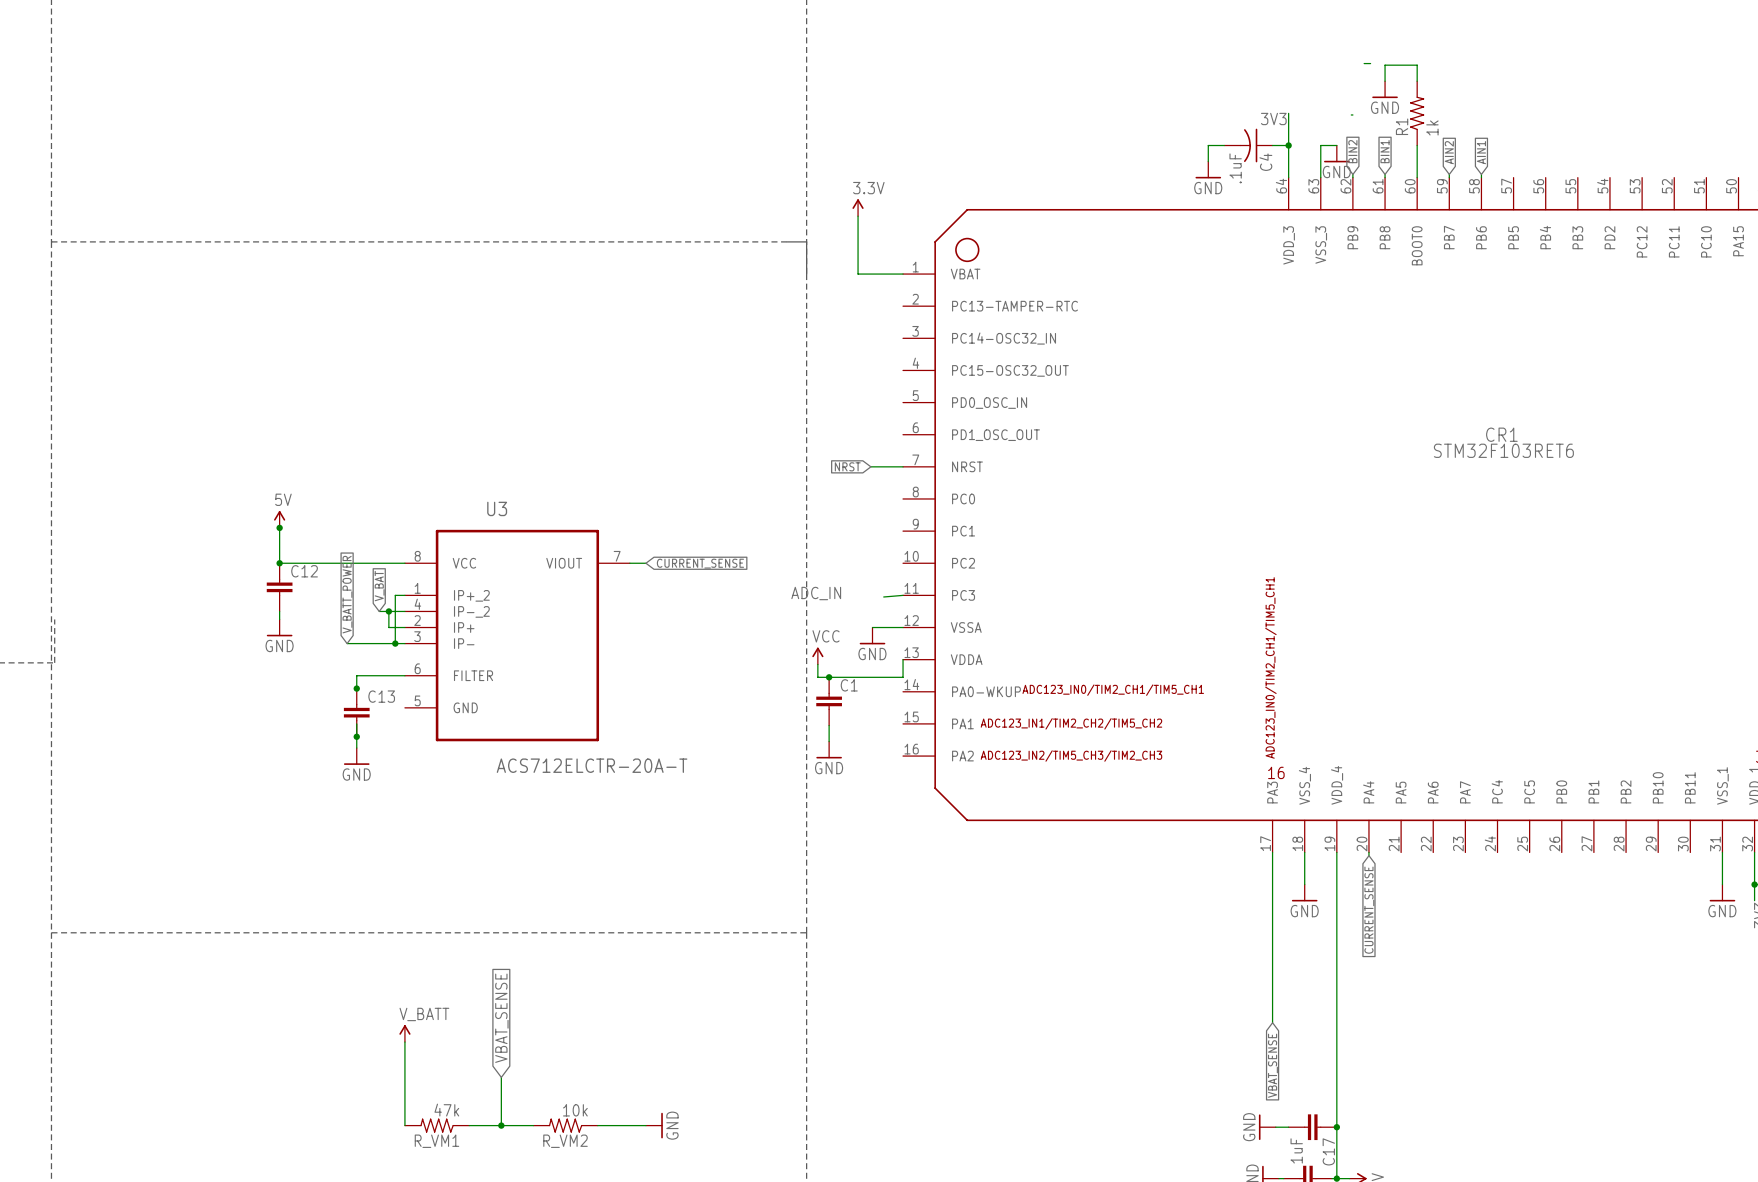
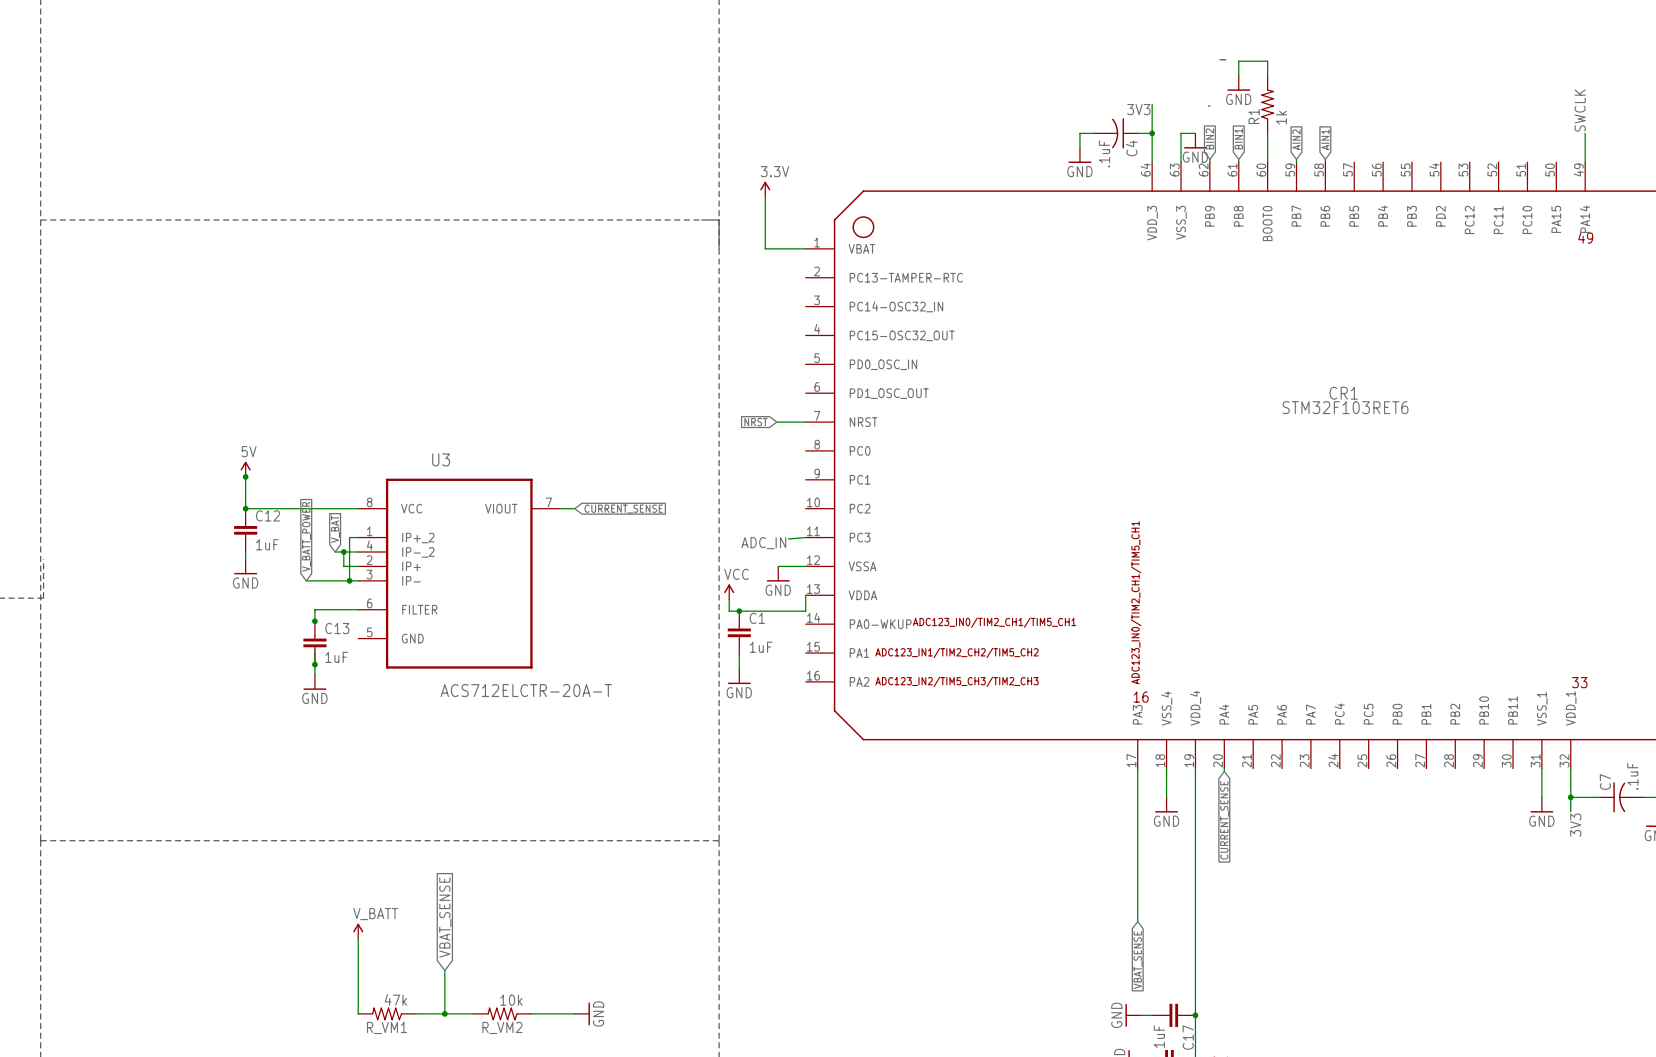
label position: ADC_IN (816, 593) -> ADC_IN (763, 543)
C12 value: none -> 1uF (267, 544)
C1 value: none -> 1uF (761, 647)
C13 value: none -> 1uF (336, 657)

